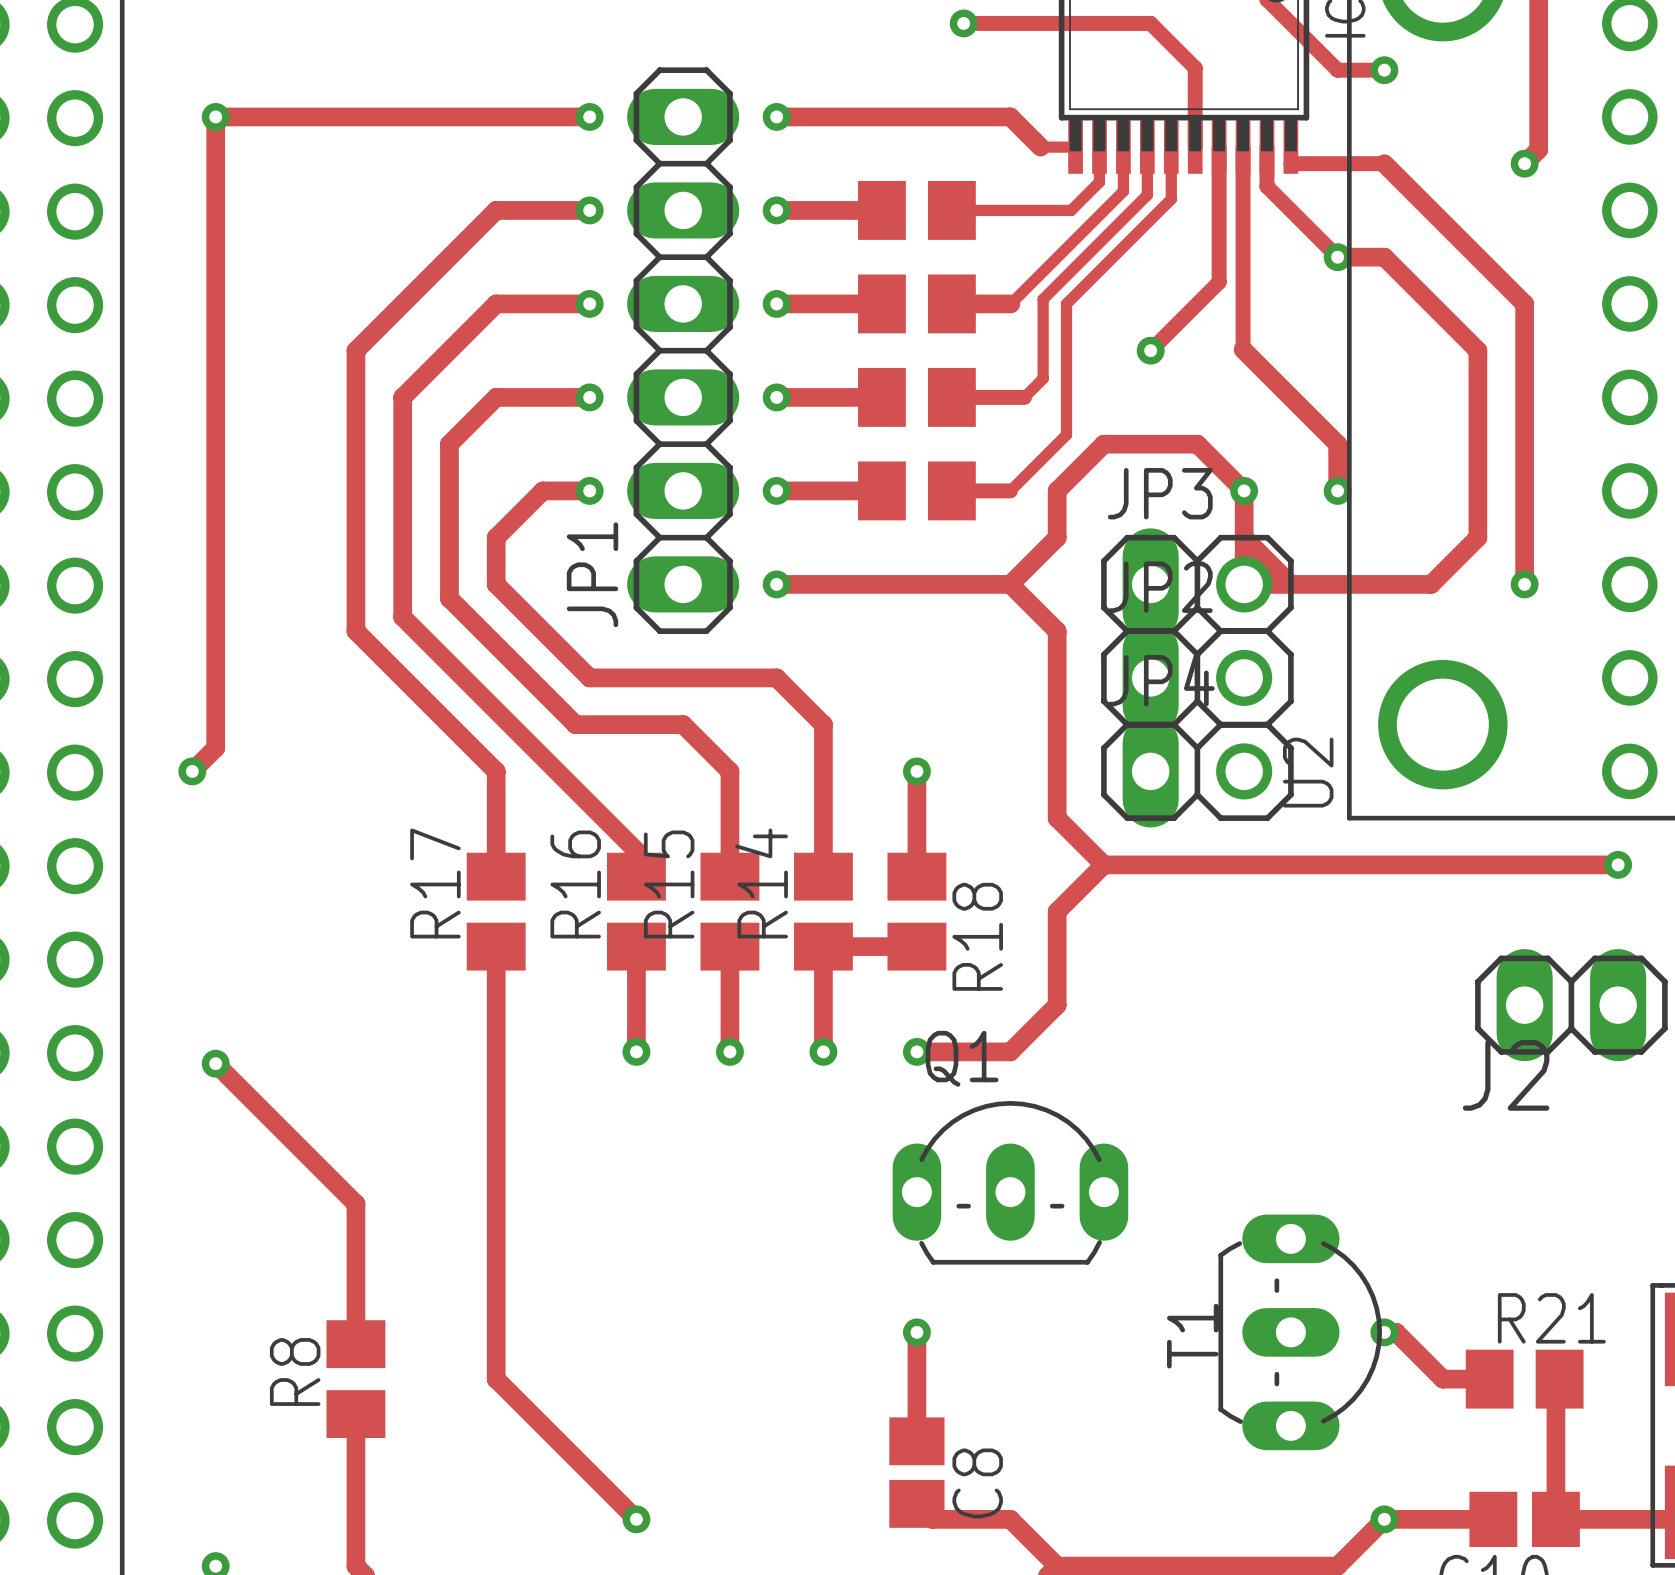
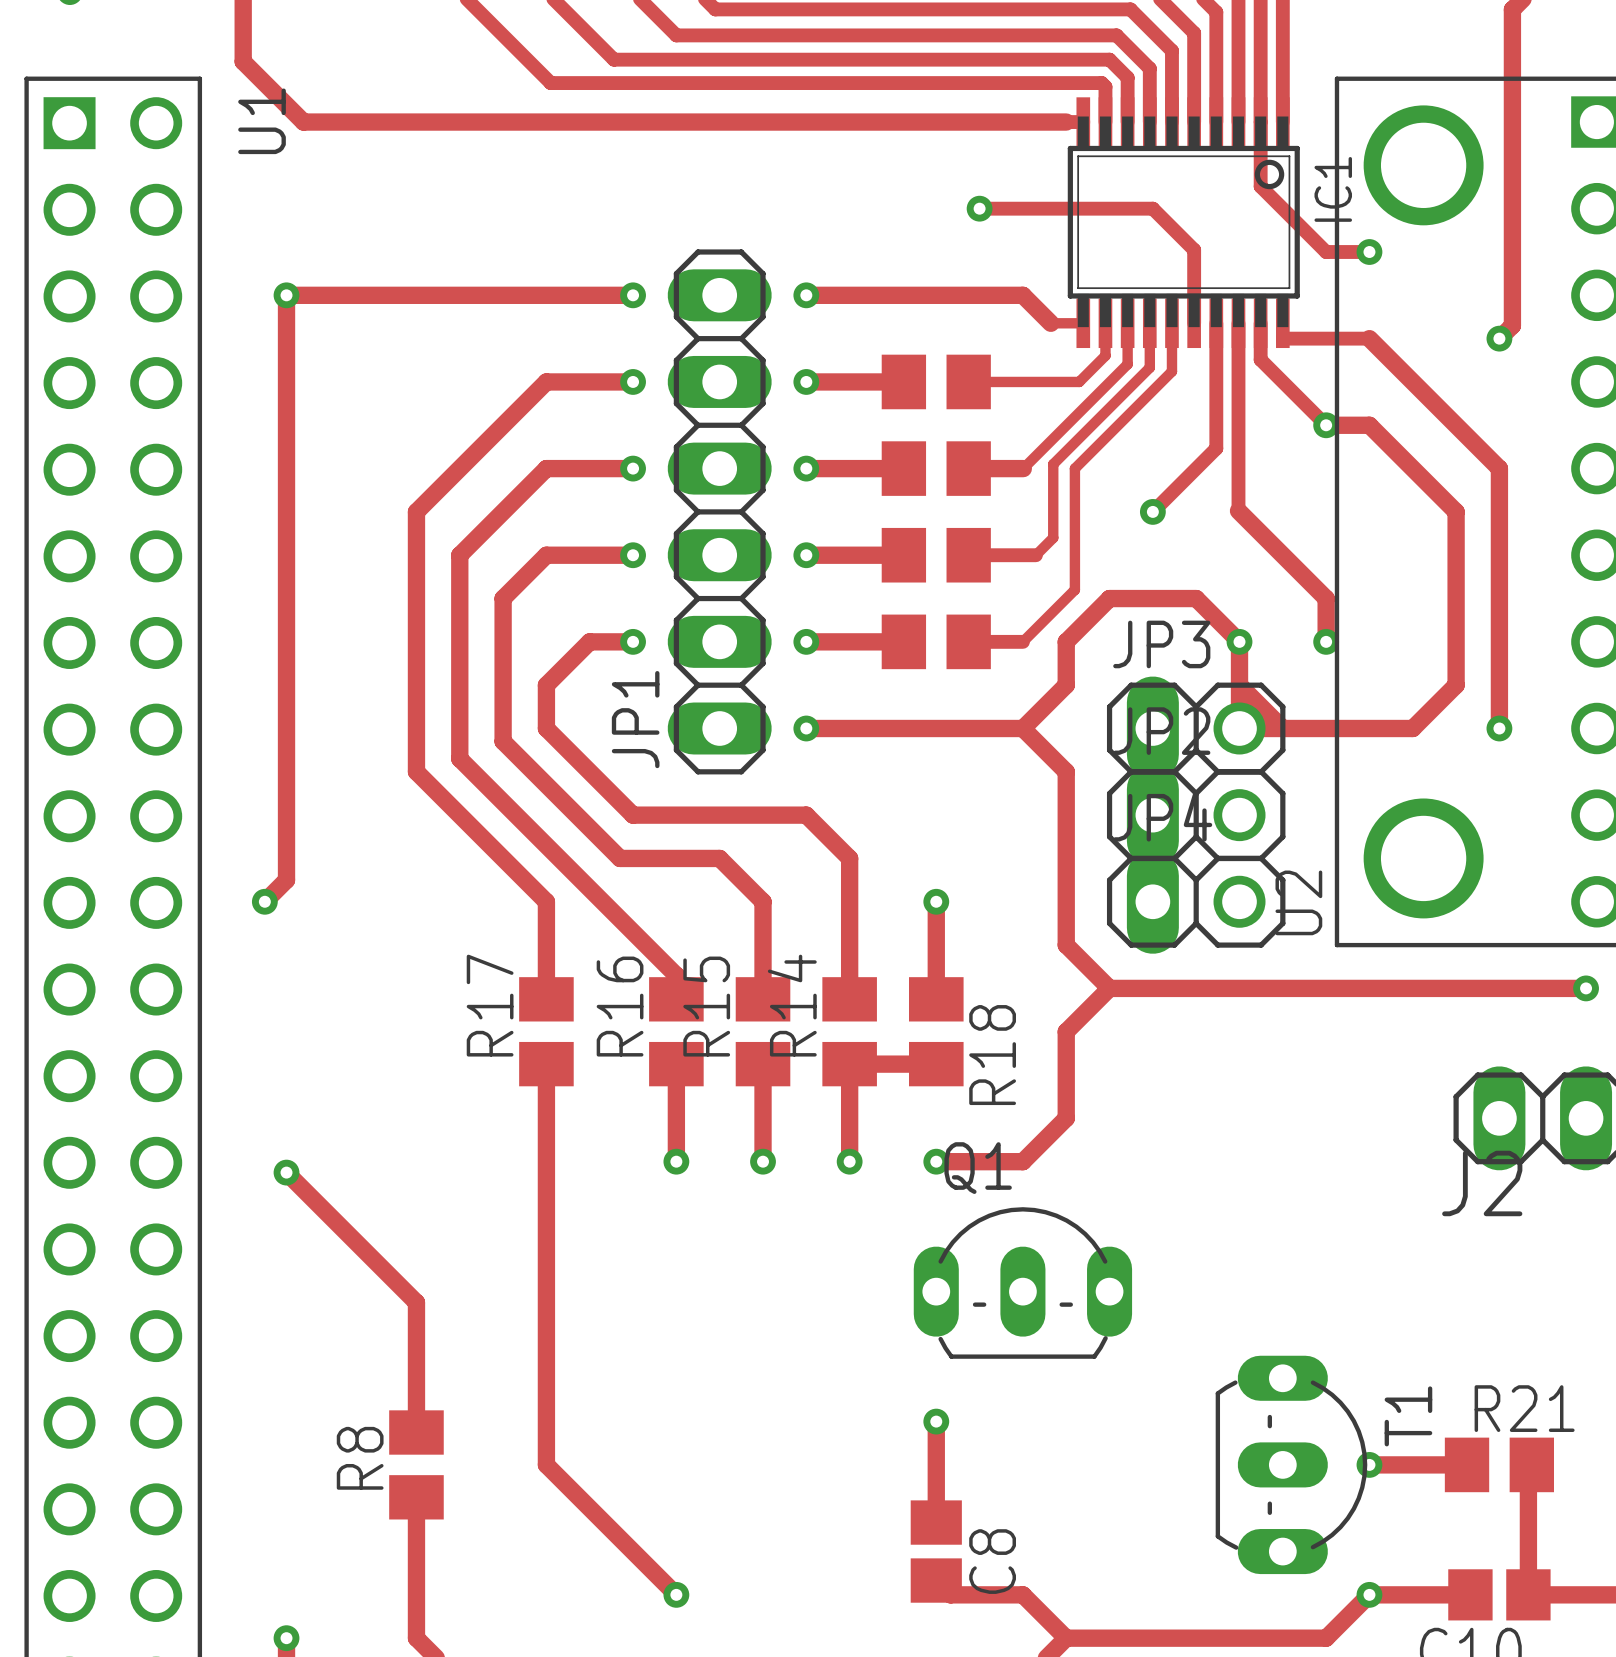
T1 position: (1300, 1332) -> (1291, 1464)
track: (1384, 1332) (1396, 1332) (1442, 1379) -> (1369, 1464) (1423, 1464)
via position: (1384, 1332) -> (1369, 1464)
T1 name position: T1 (1192, 1336) -> T1 (1408, 1416)

